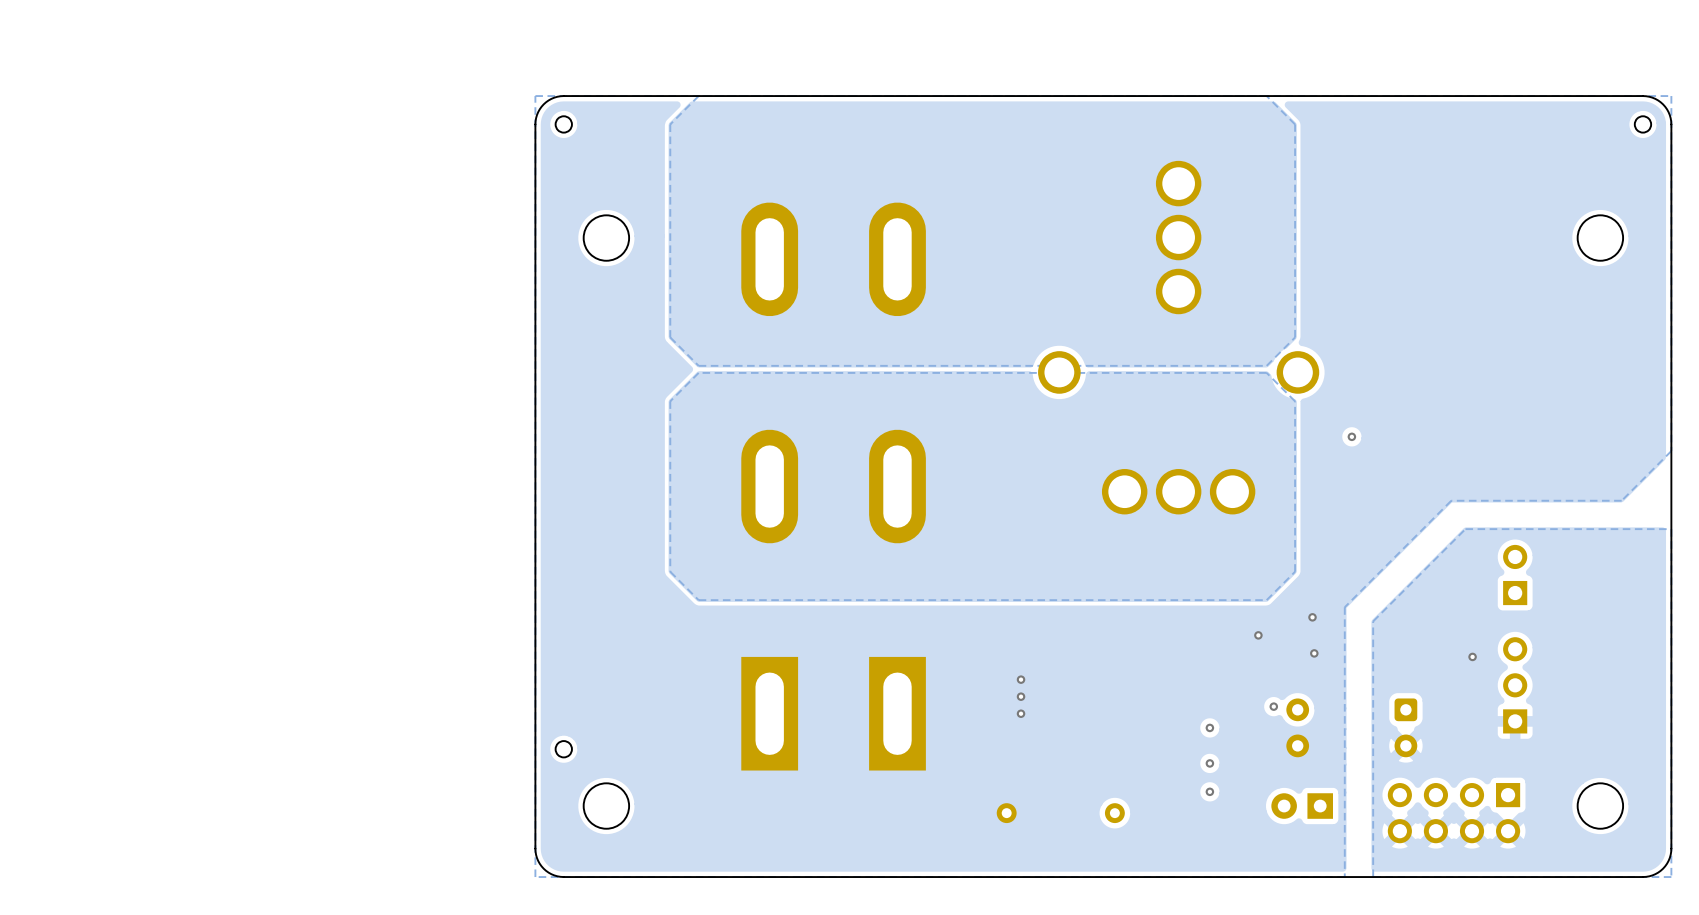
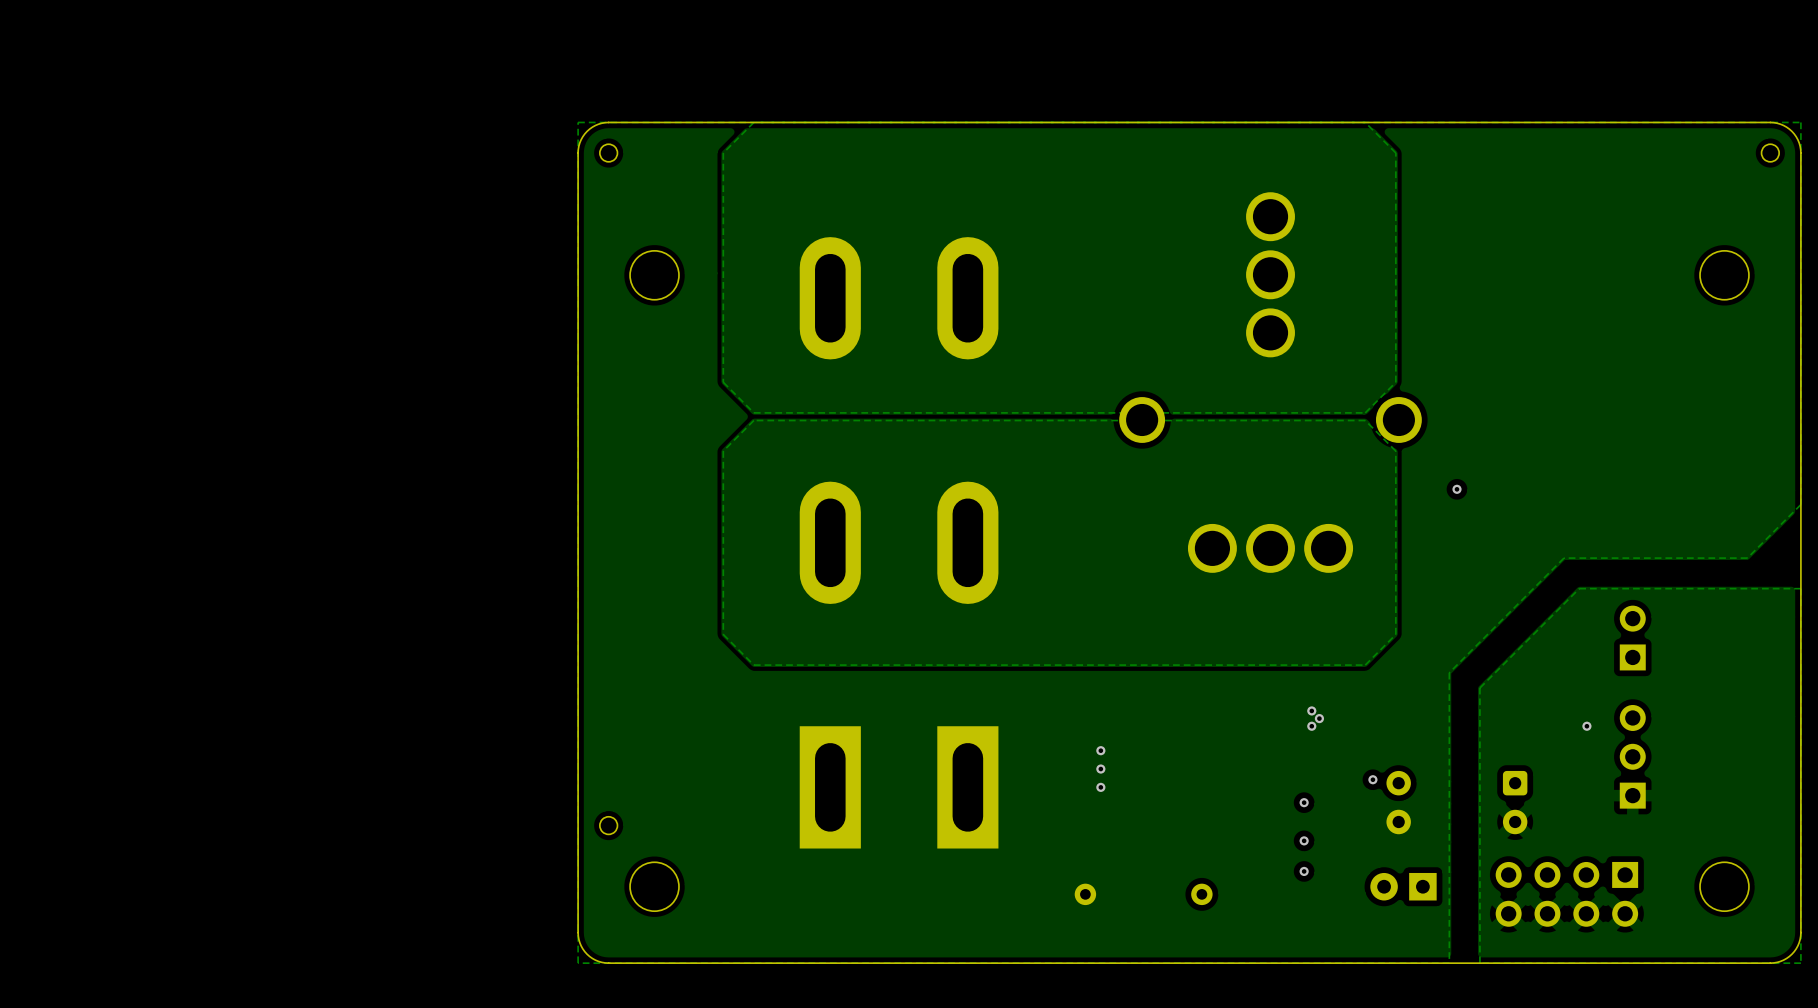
via: (1312, 617) -> none
via: (1258, 635) -> none
via: none -> (1311, 710)
via: none -> (1319, 718)
via: (1314, 653) -> none
via: none -> (1311, 726)

